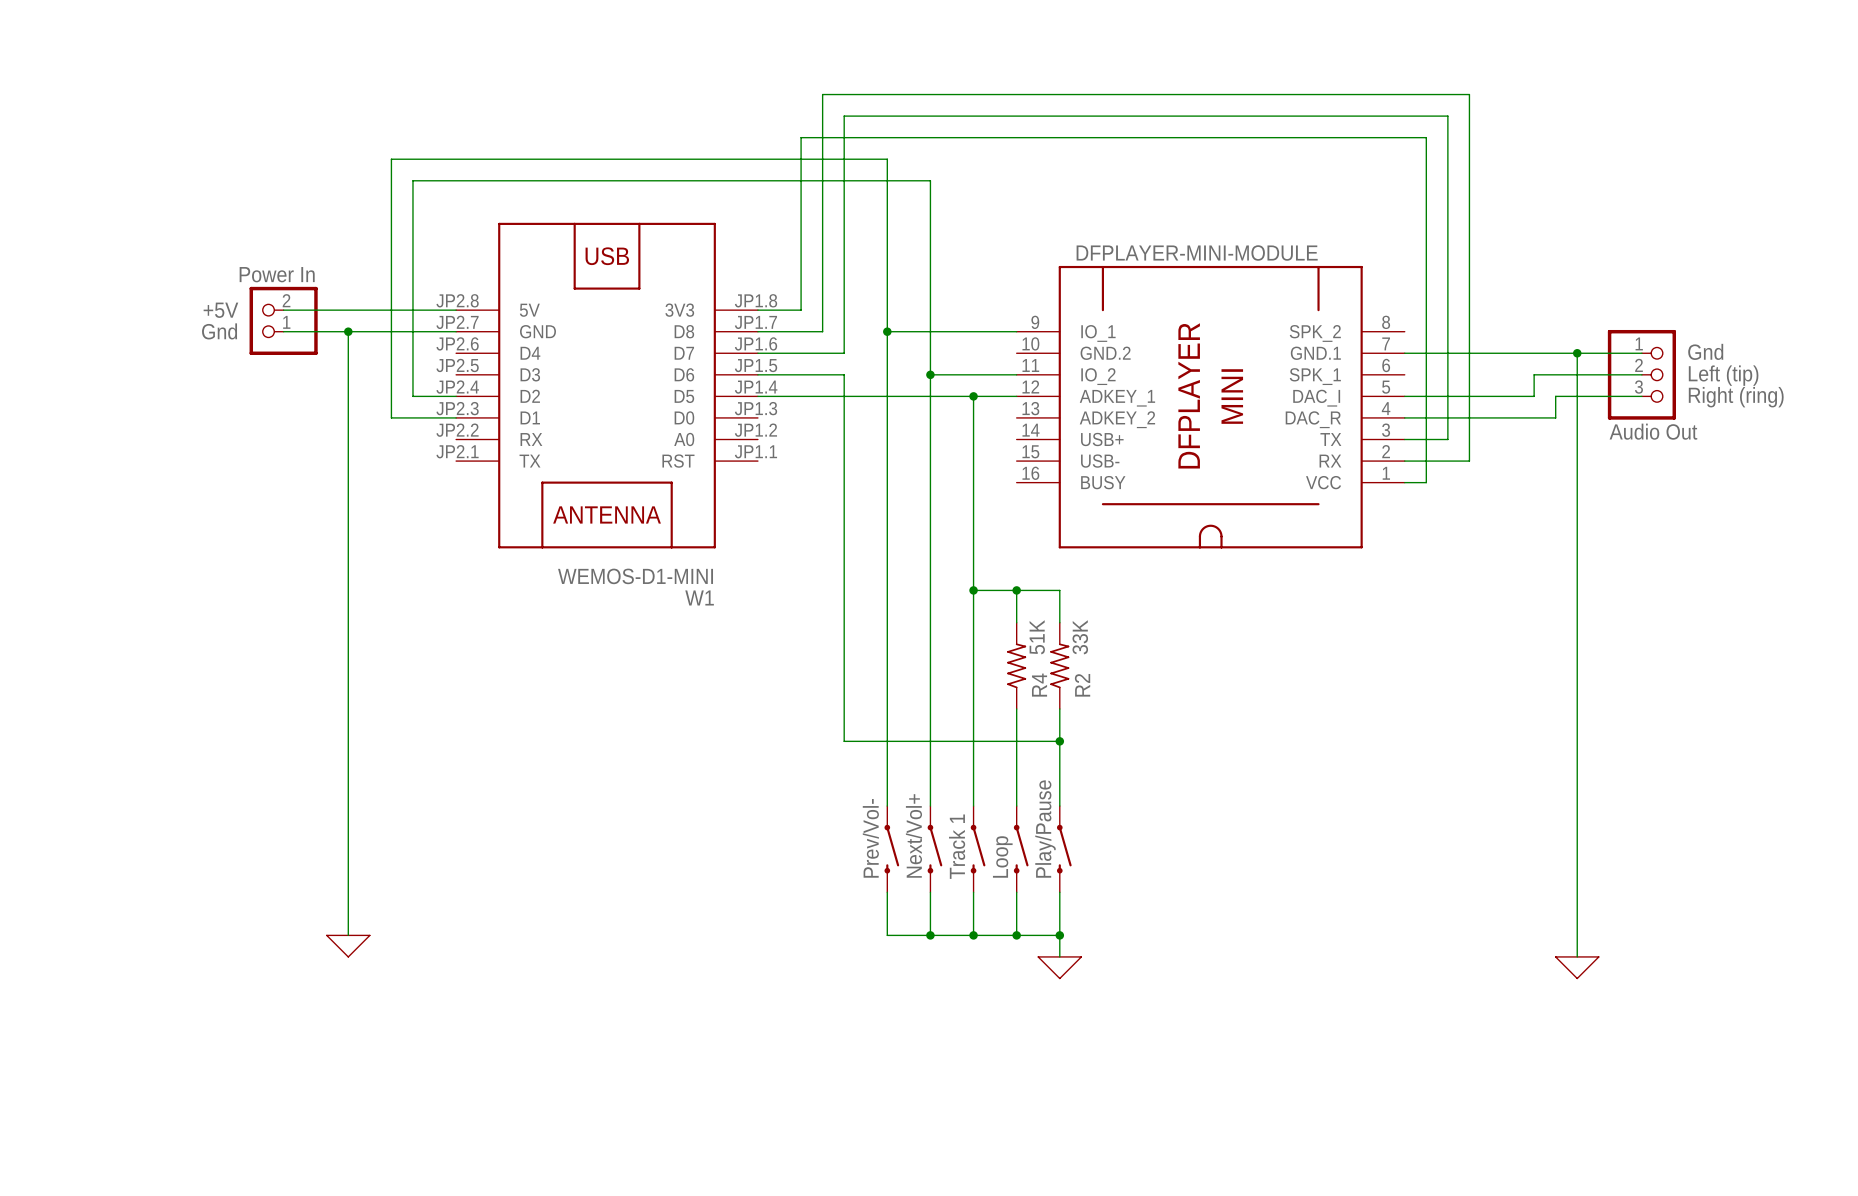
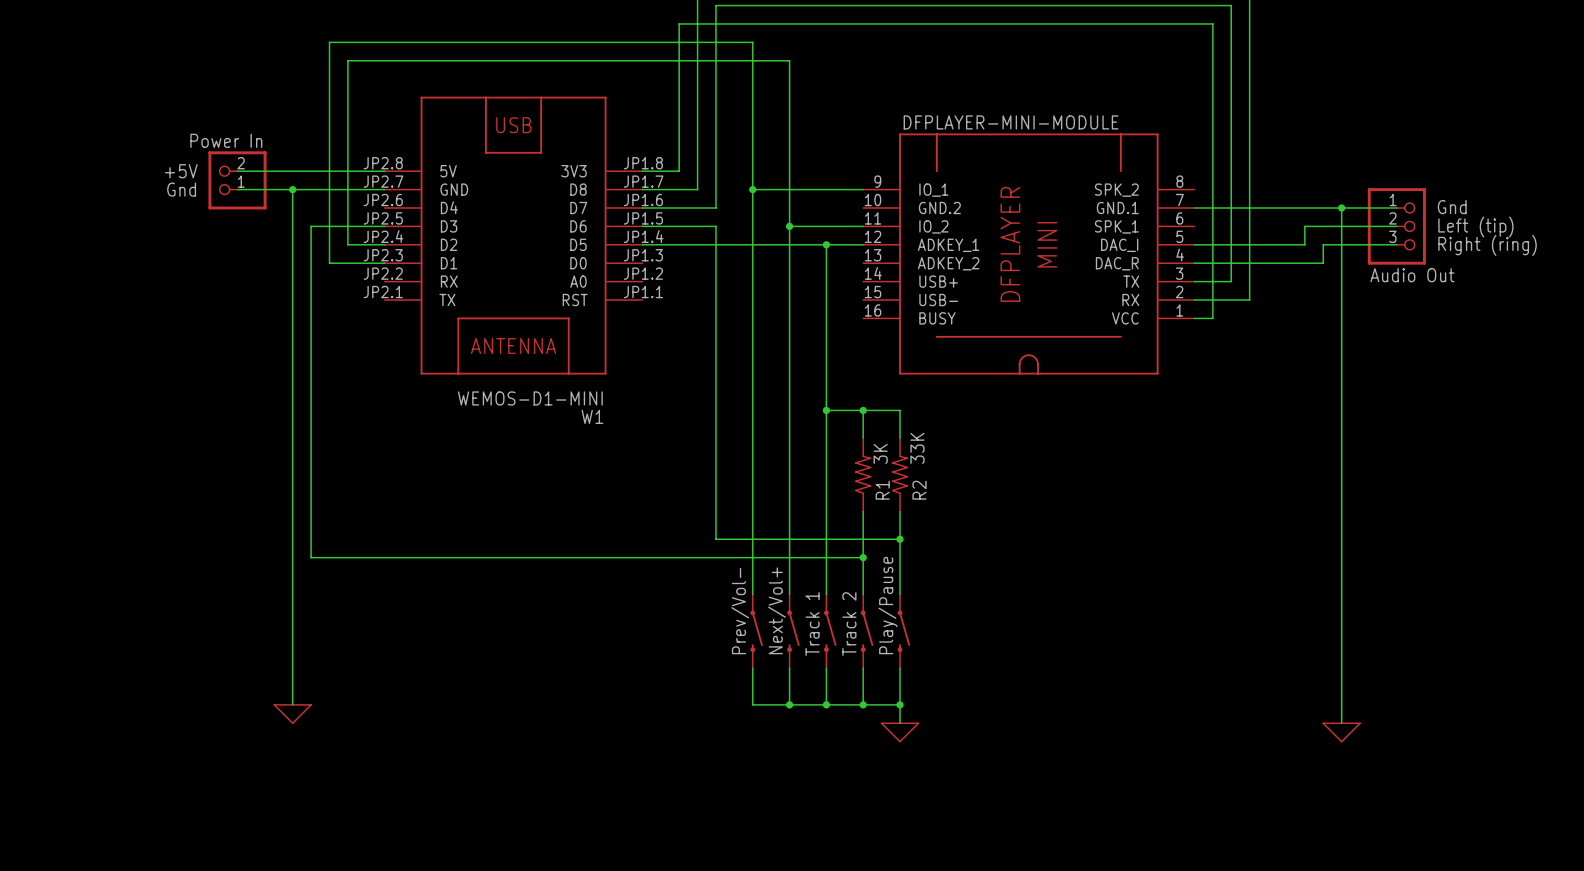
wire: none -> (384, 226) (311, 226) (311, 557) (863, 557)
R4 value: 51K (1037, 637) -> 3K (880, 453)
R4 name: R4 (1039, 685) -> R1 (882, 490)
junction: none -> (863, 557)
text: Loop (1002, 856) -> Track 2 (849, 624)

